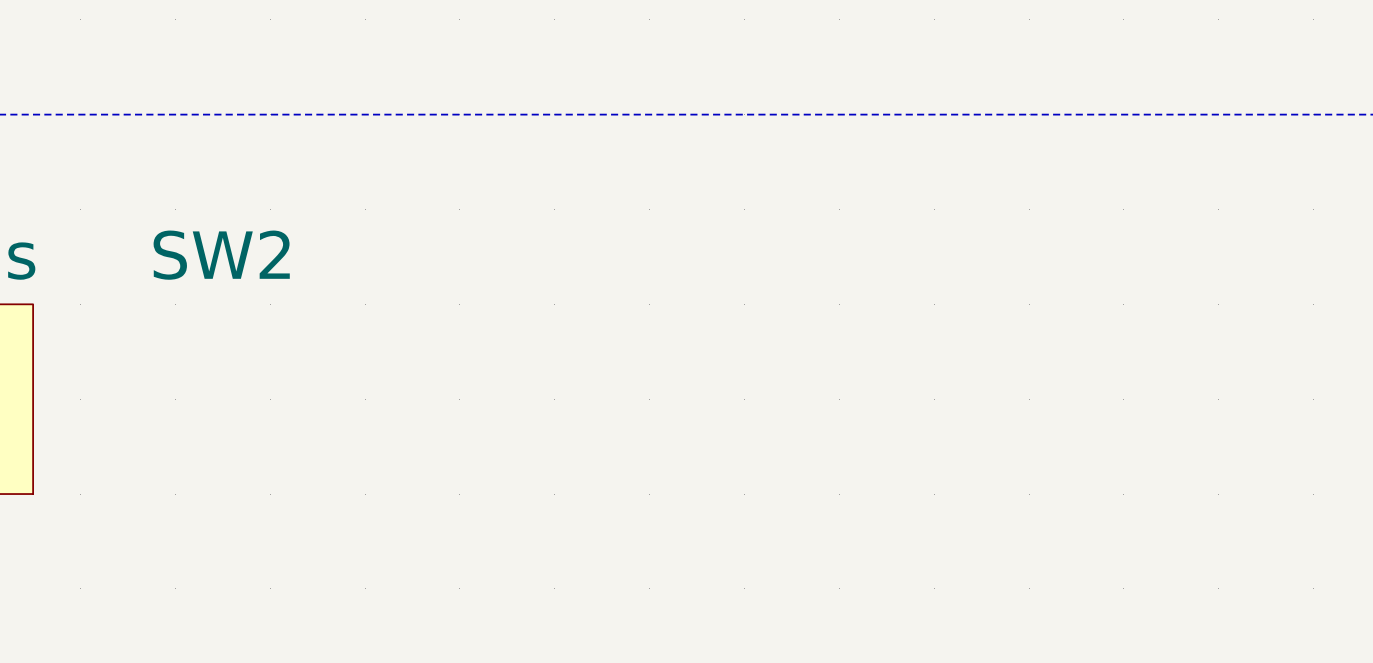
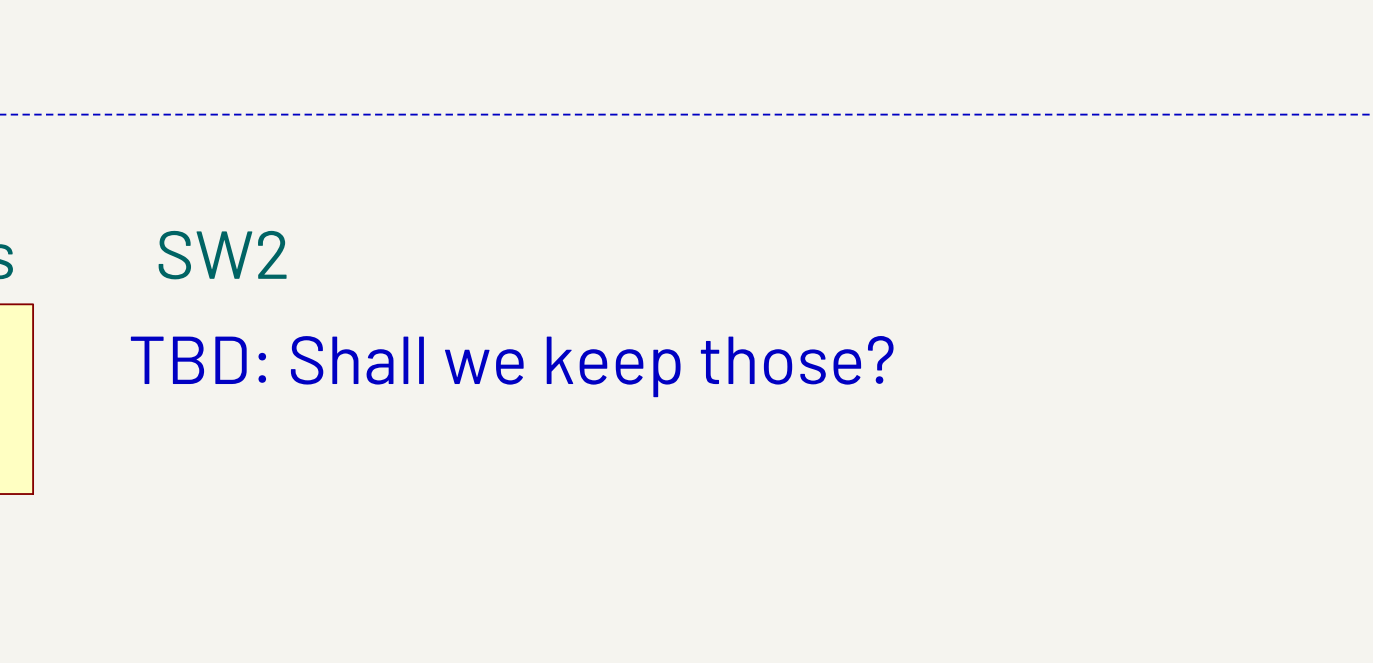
text: none -> TBD: Shall we keep those? (512, 366)

